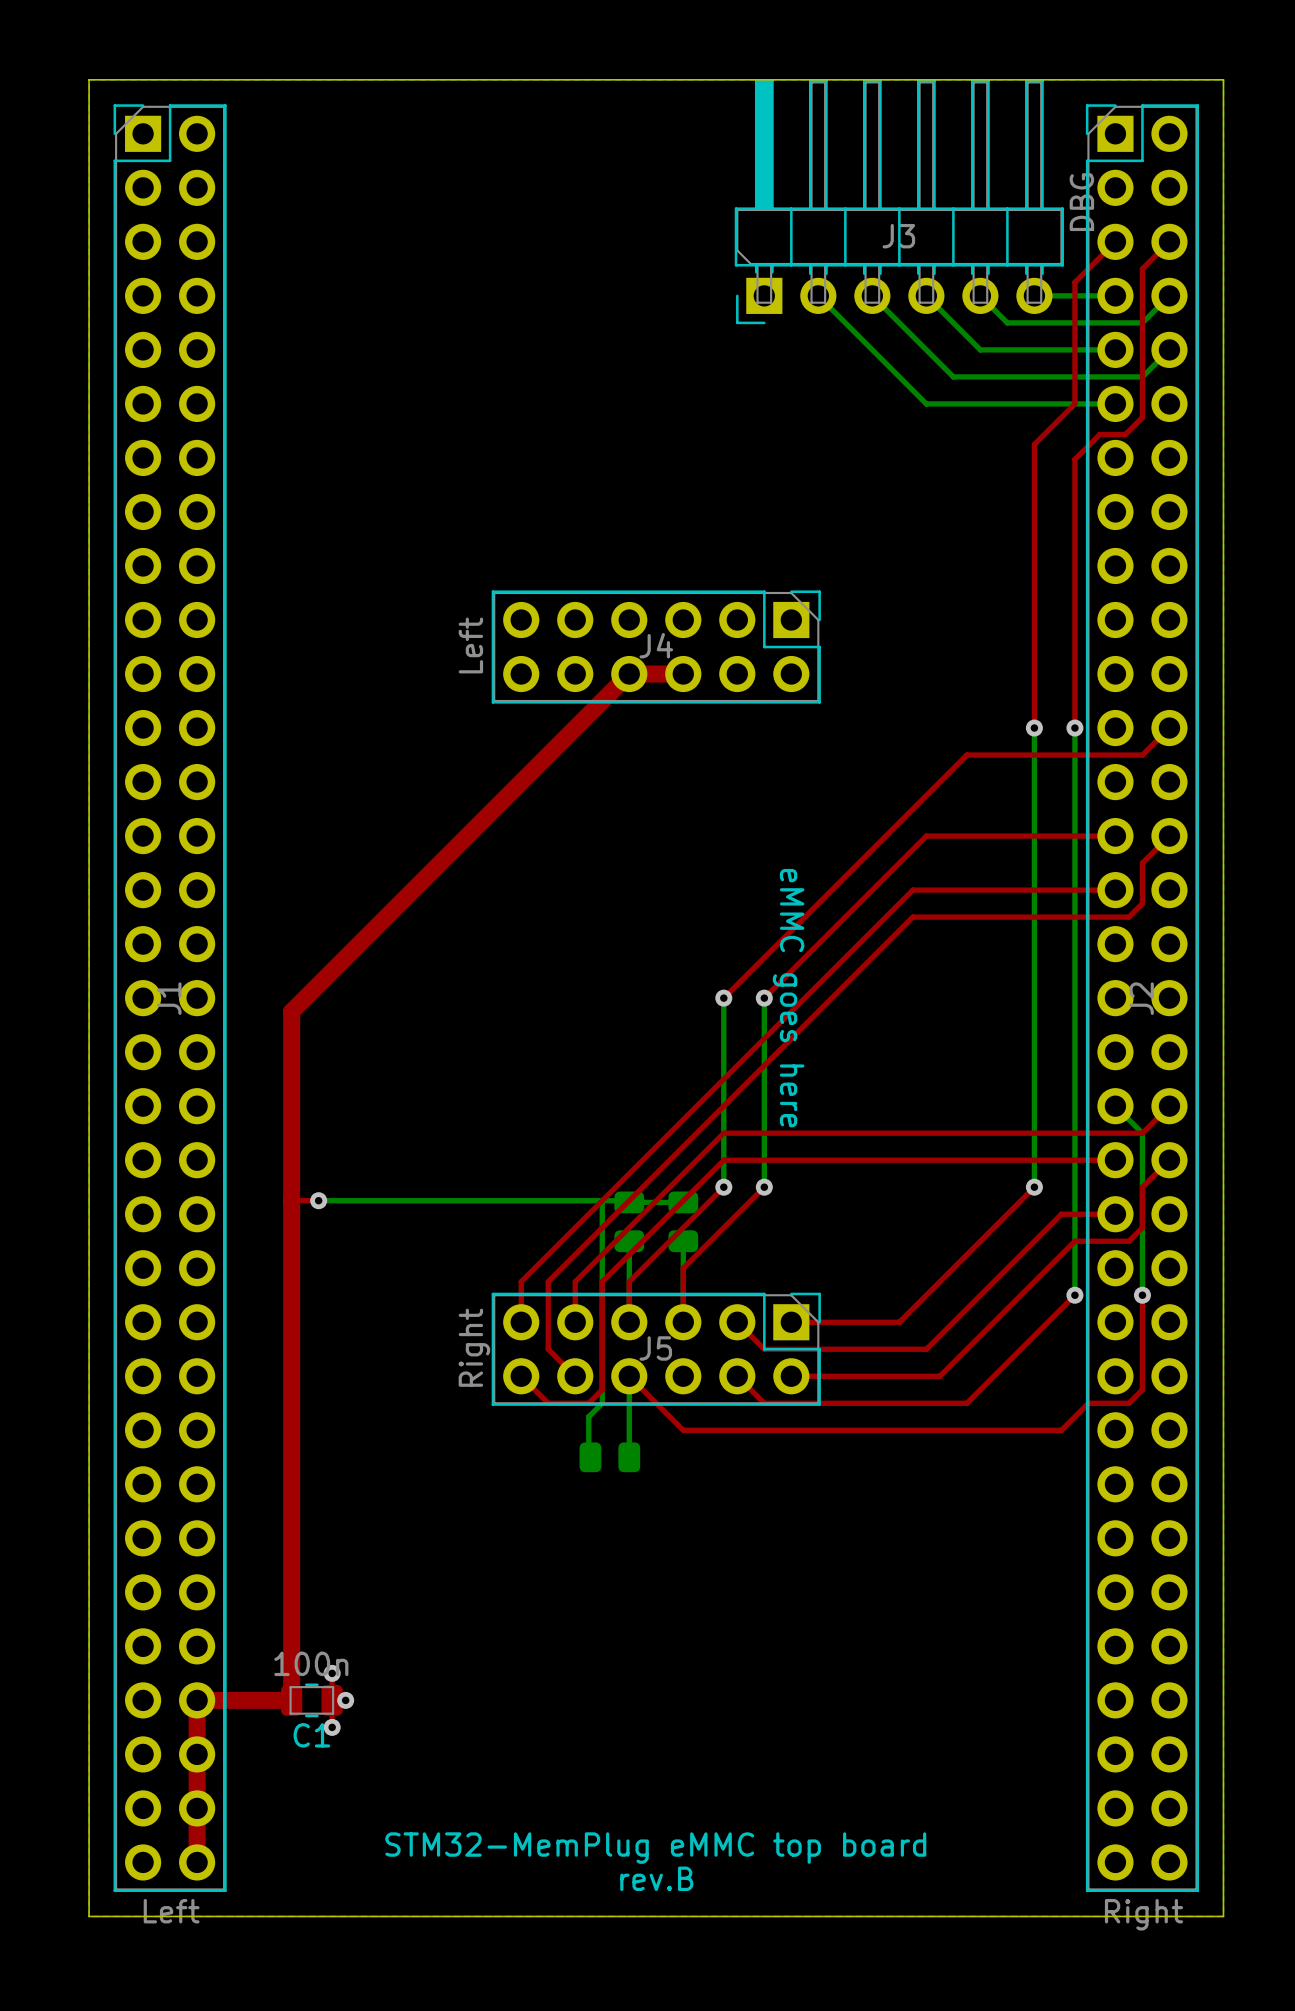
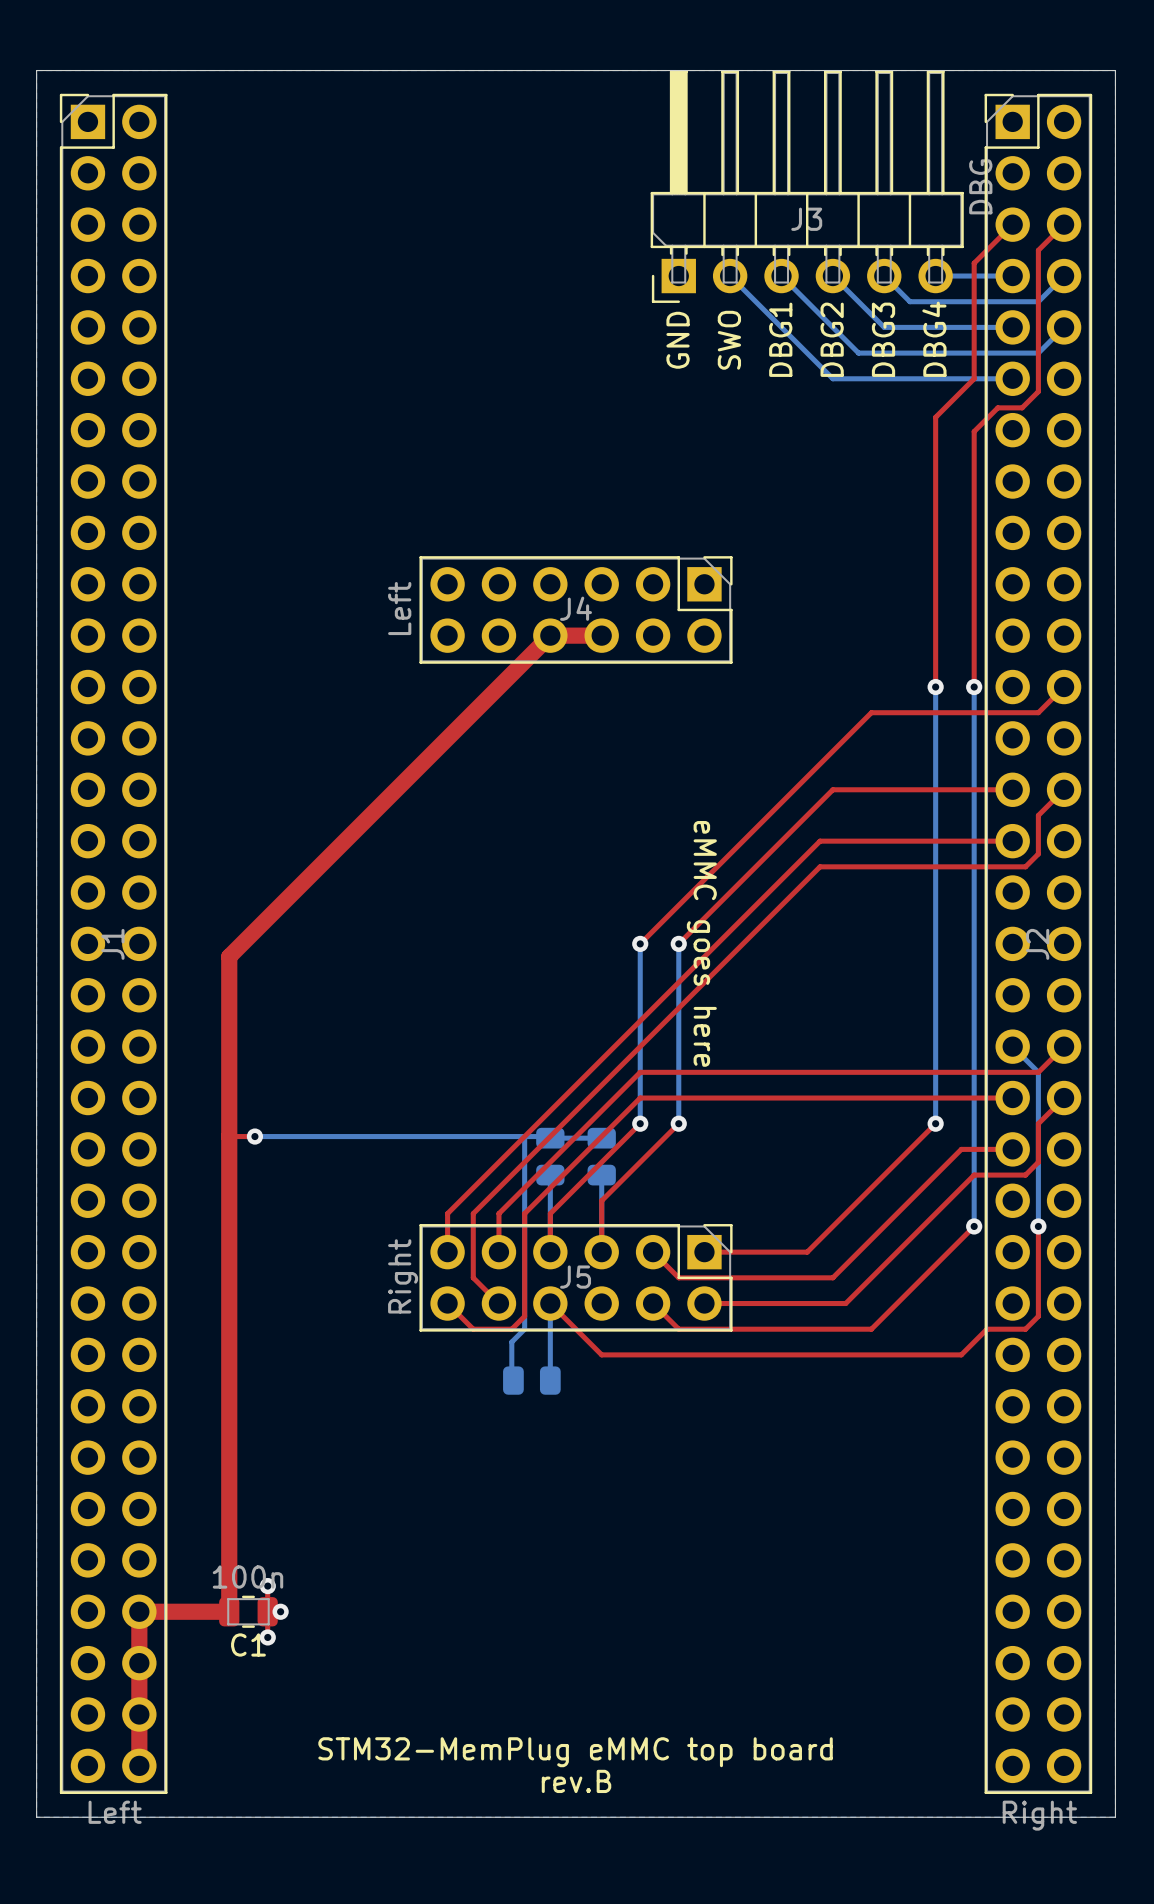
text: none -> DBG1 (780, 339)
text: none -> DBG2 (832, 339)
text: none -> DBG3 (883, 339)
text: none -> DBG4 (934, 339)
text: none -> GND (678, 340)
text: none -> SWO (729, 340)

